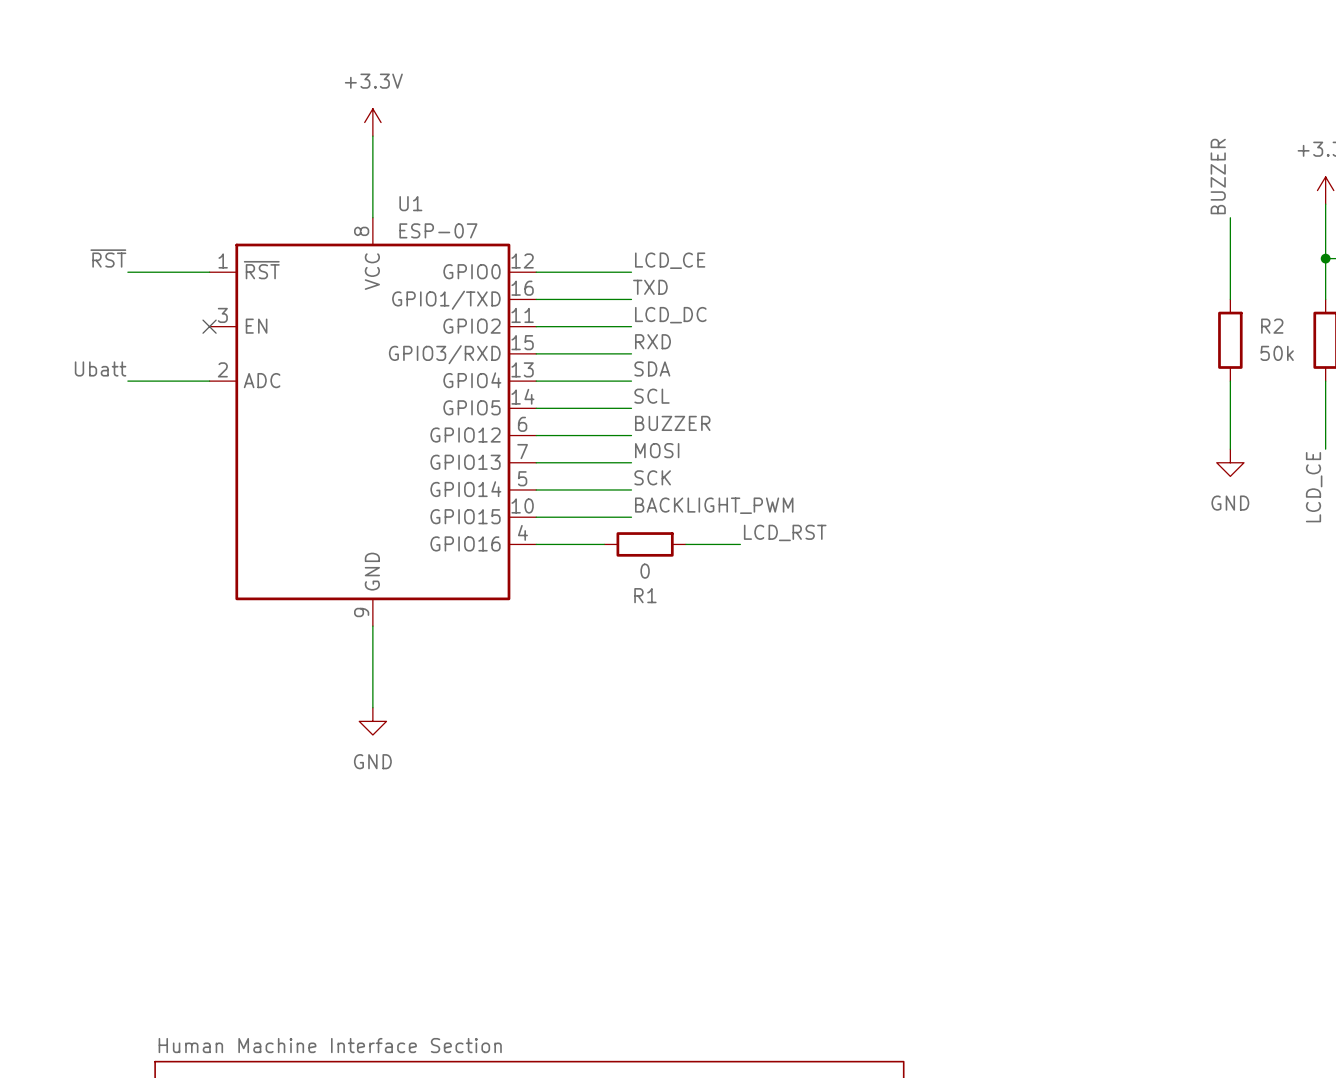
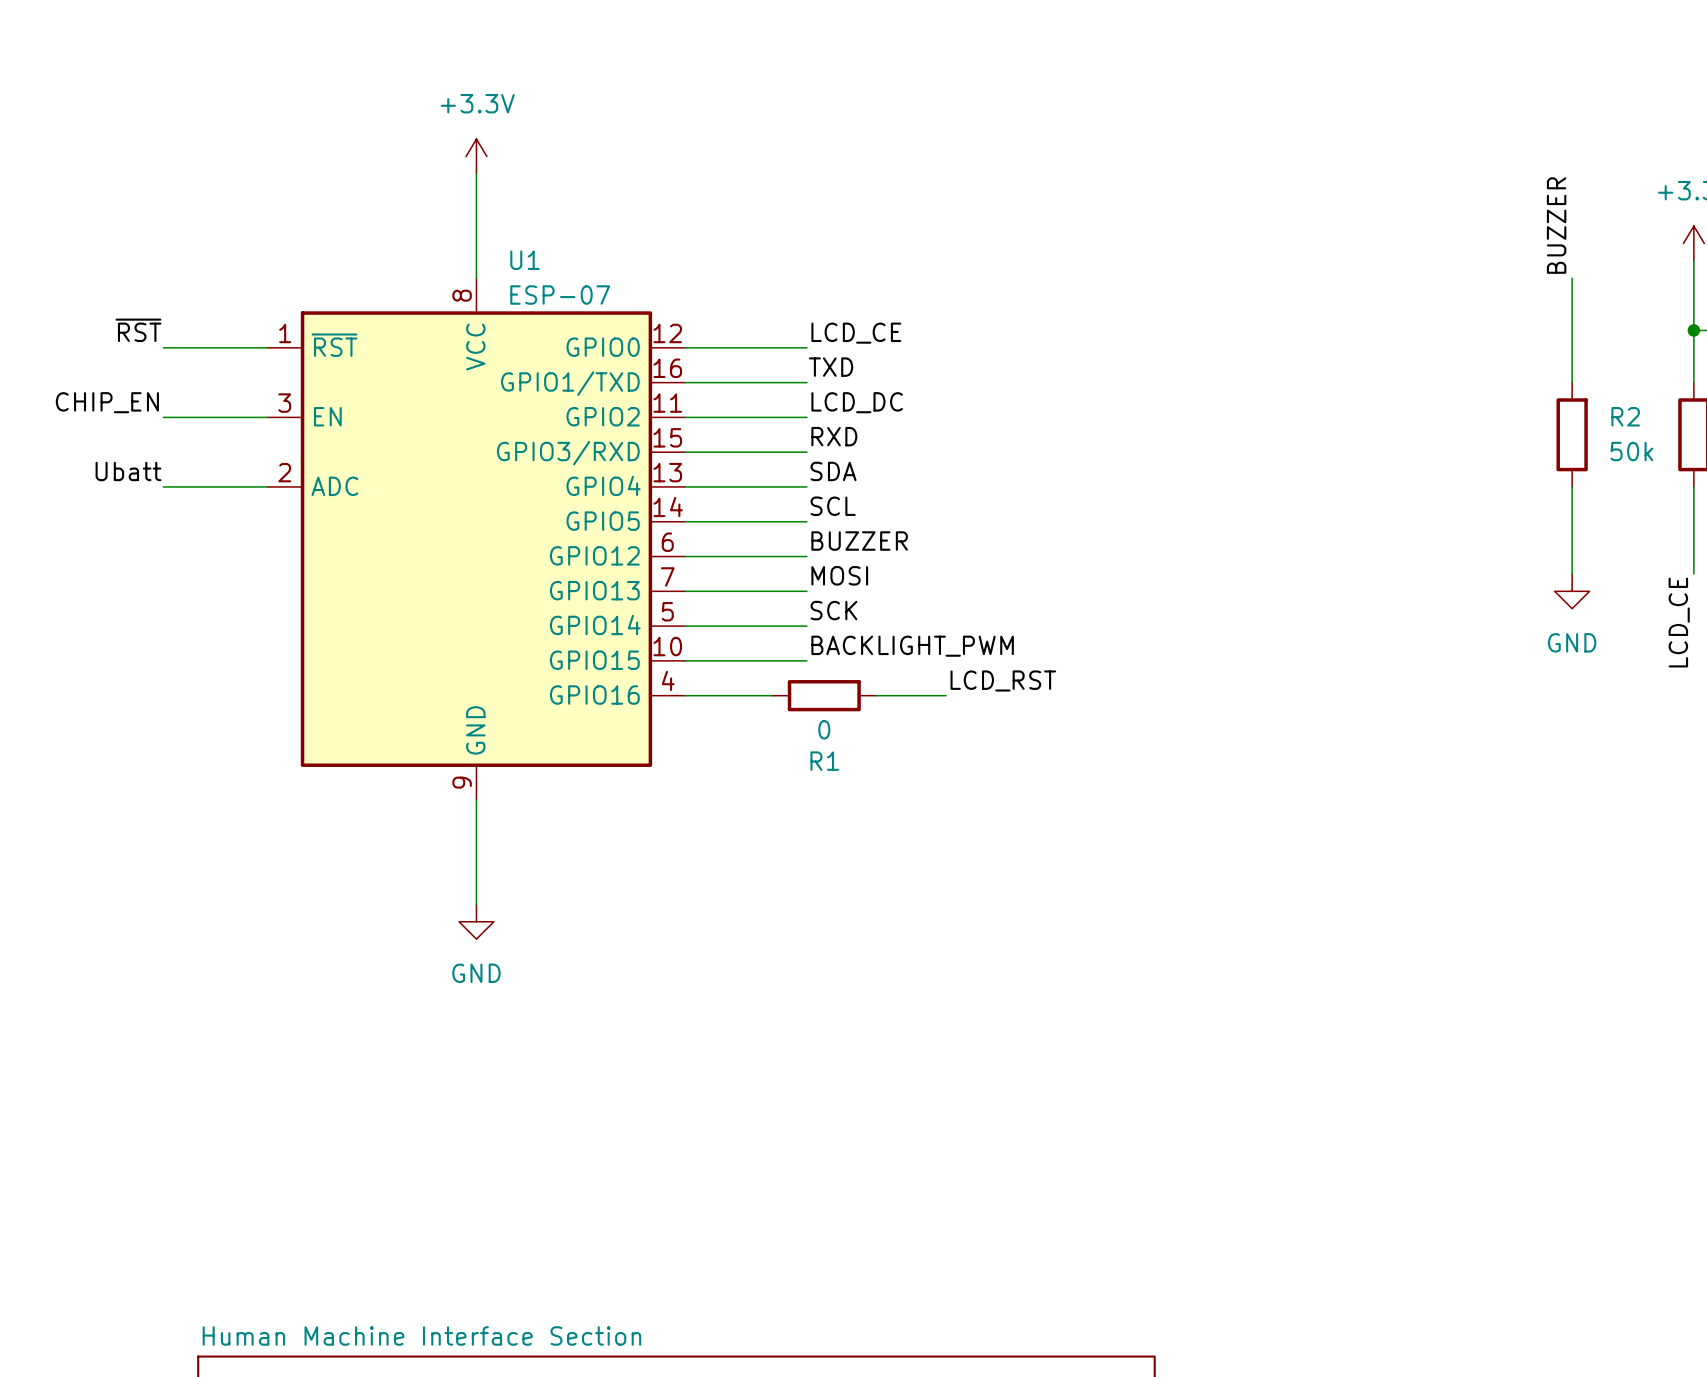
label: none -> CHIP_EN (107, 402)
wire: none -> (163, 417) (267, 417)
no-connect mark: (209, 326) -> none

